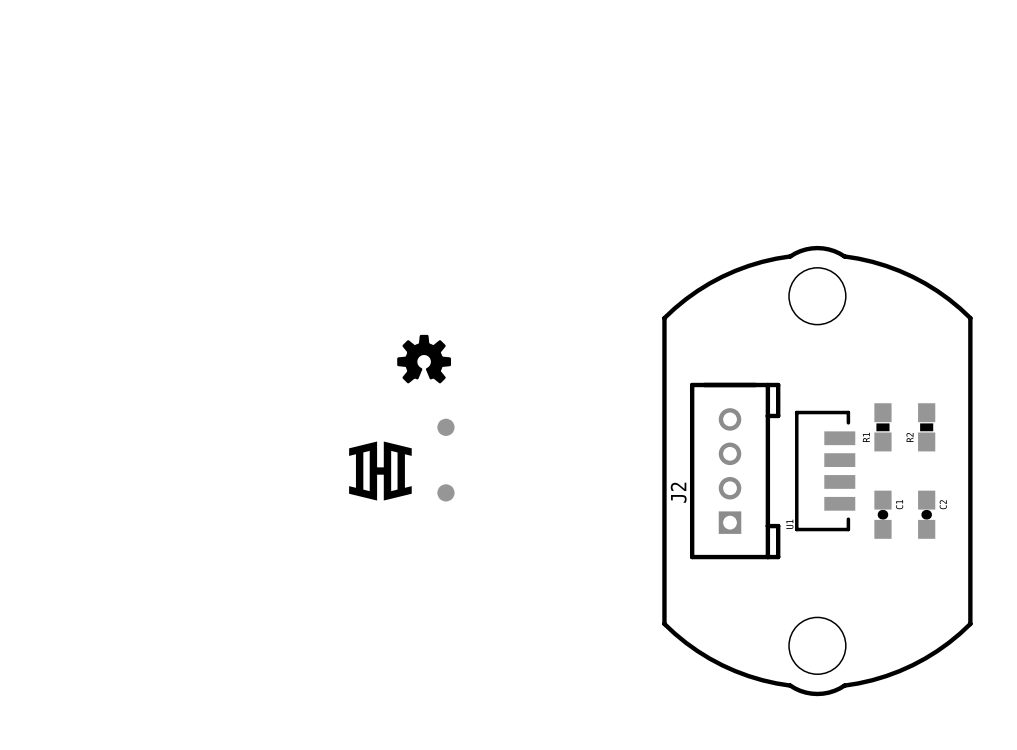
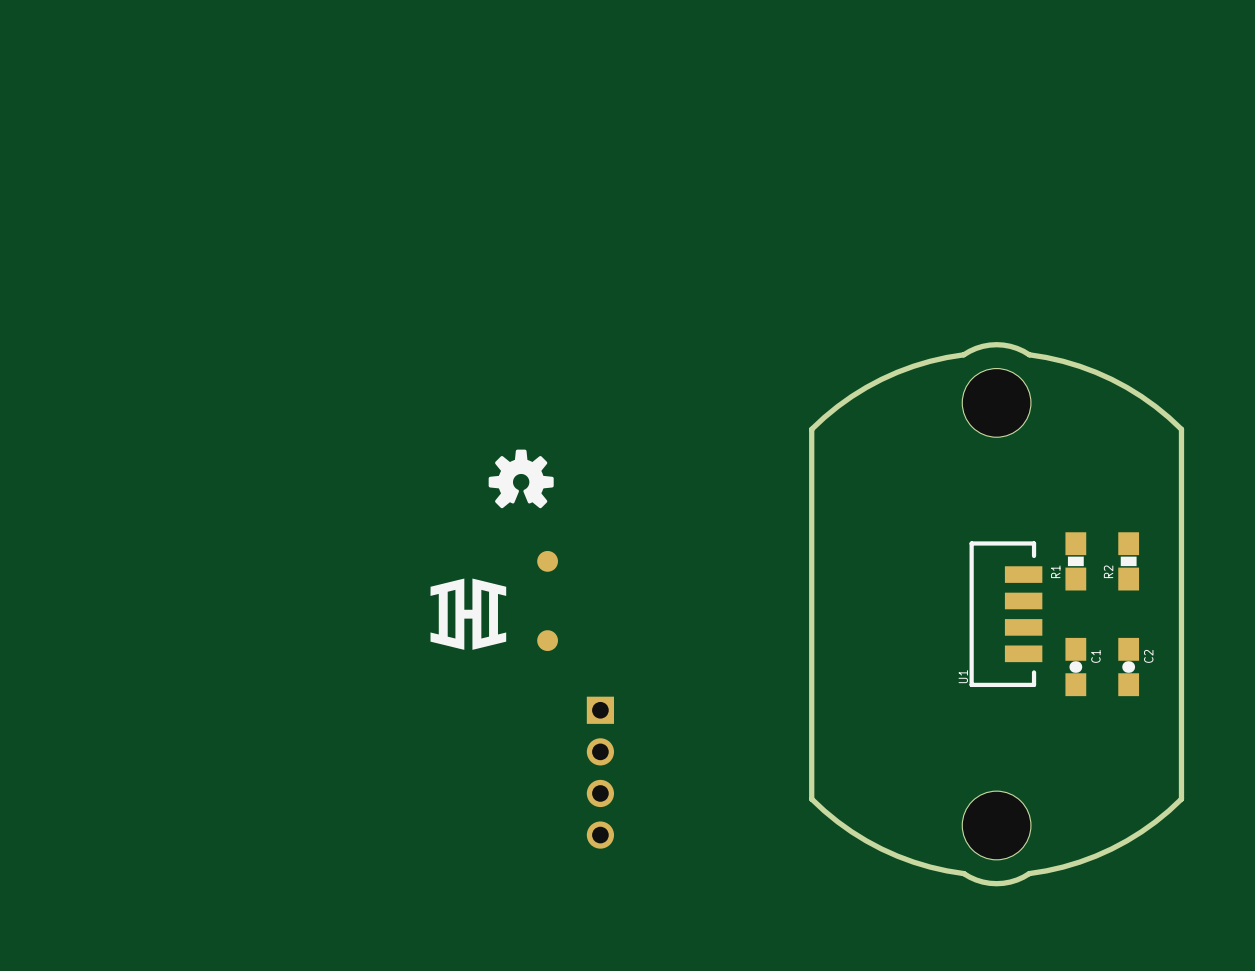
J2: (735, 471) -> none
part: none -> (600, 772)

